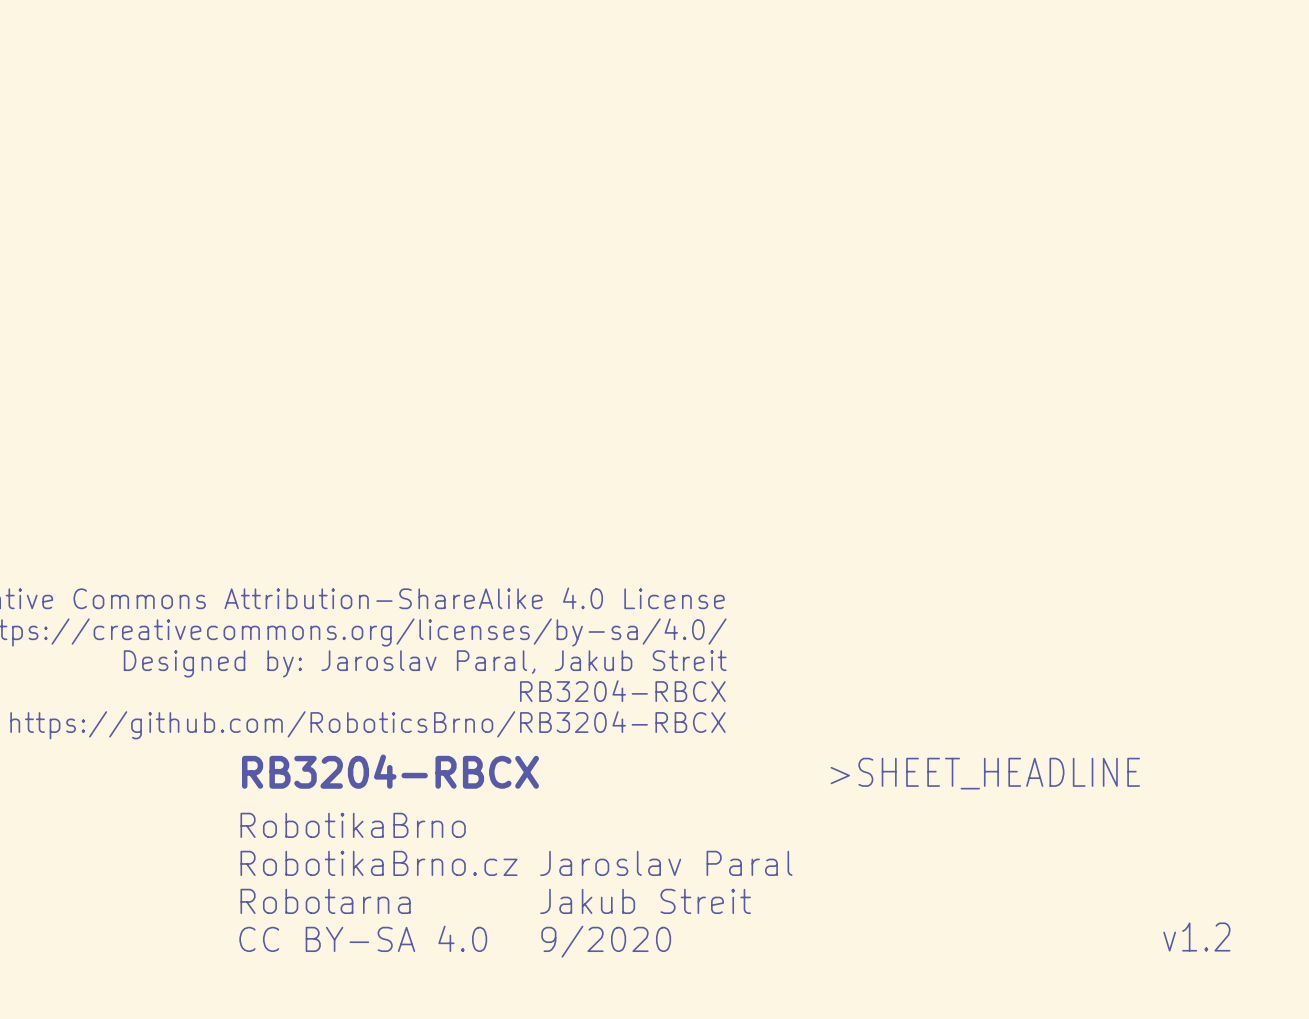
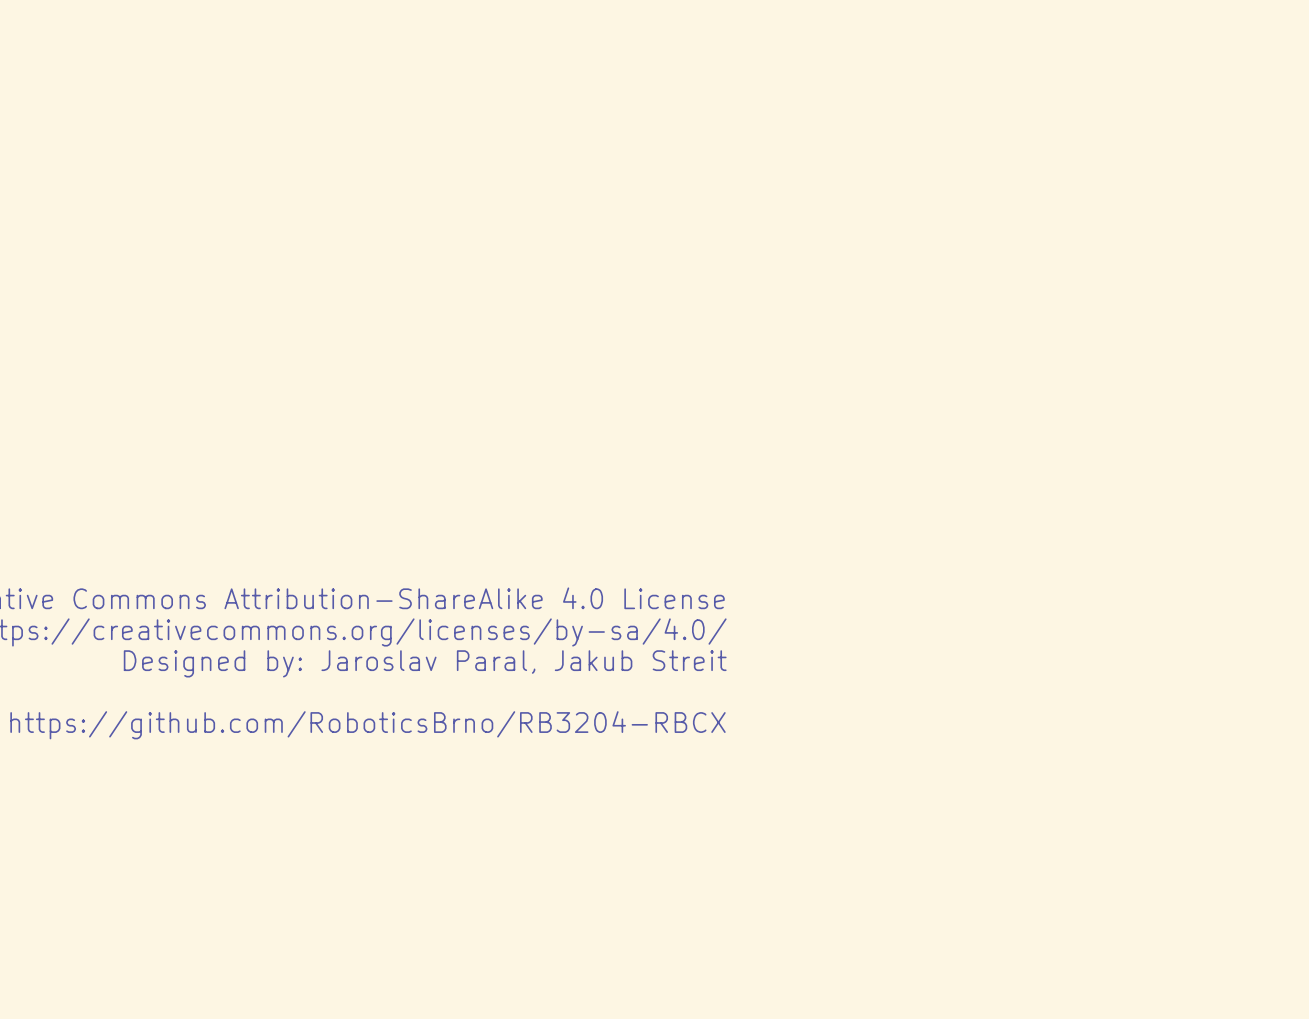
text: RB3204-RBCX (622, 691) -> none
text: RB3204-RBCX (390, 771) -> none
text: >SHEET_HEADLINE (985, 773) -> none
text: RobotikaBrno (353, 825) -> none
text: RobotikaBrno.cz (378, 863) -> none
text: Jaroslav Paral (666, 863) -> none
text: Robotarna (325, 901) -> none
text: Jakub Streit (645, 901) -> none
text: v1.2 (1196, 937) -> none
text: CC BY-SA 4.0 (363, 938) -> none
text: 9/2020 (606, 941) -> none

